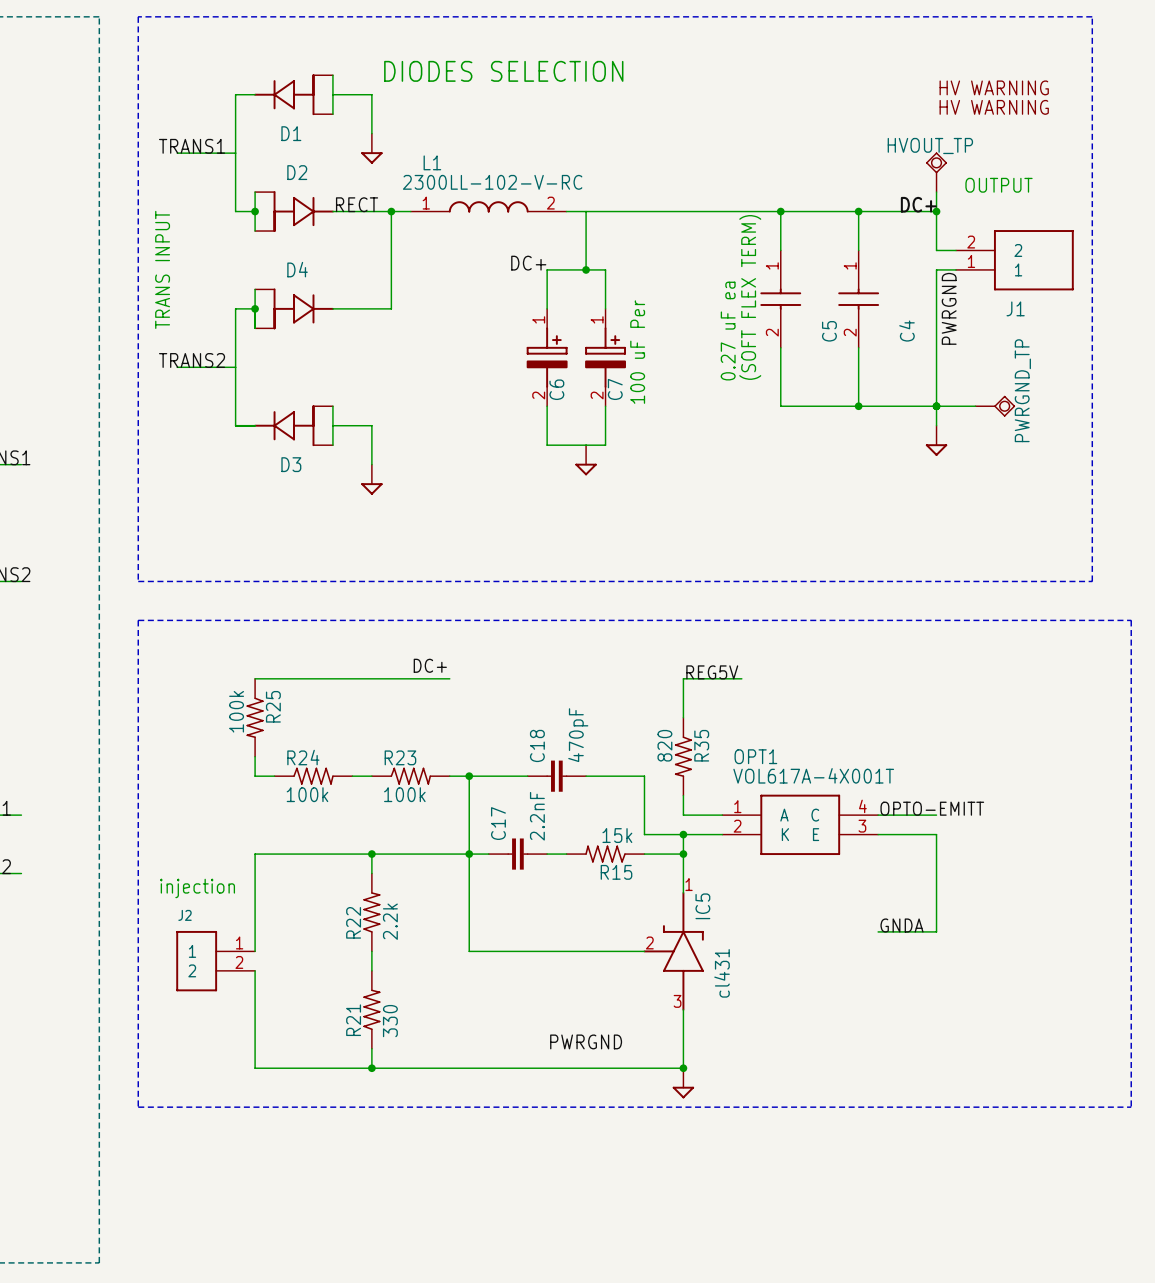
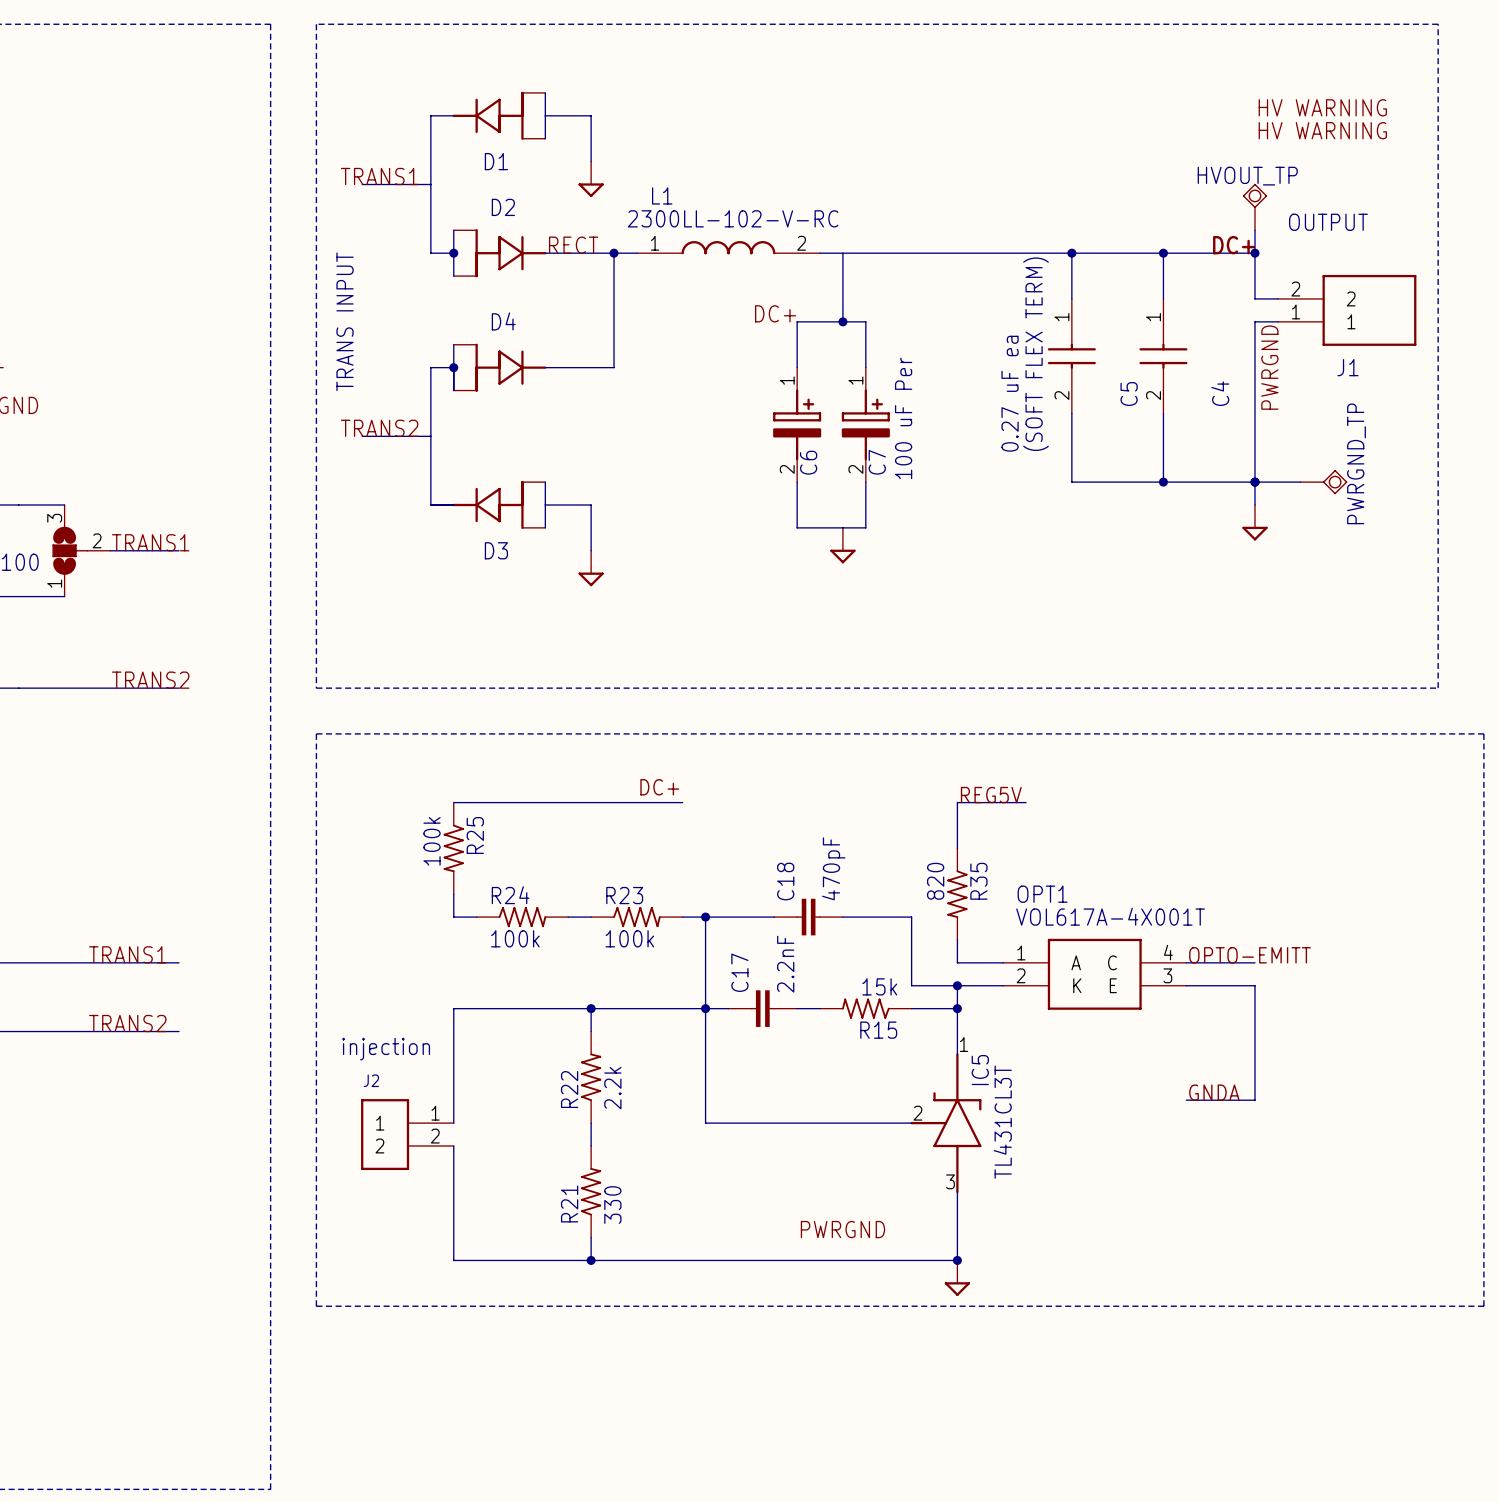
text: DIODES SELECTION (503, 71) -> none
IC5 value: cl431 (722, 973) -> TL431CL3T (1002, 1122)

